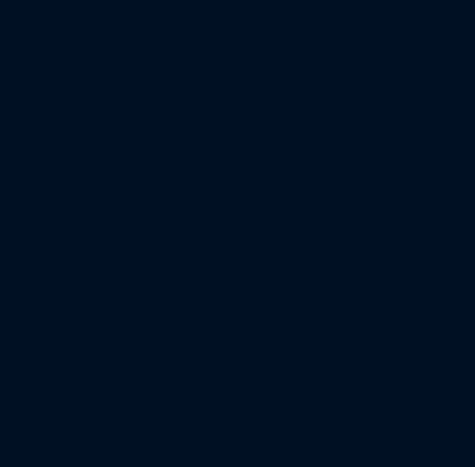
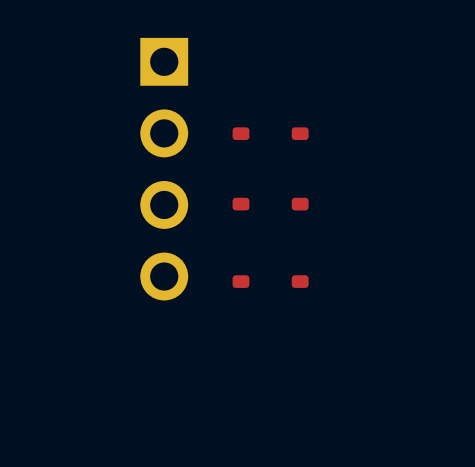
part: none -> (270, 133)
part: none -> (164, 169)
part: none -> (270, 204)
part: none -> (270, 281)

